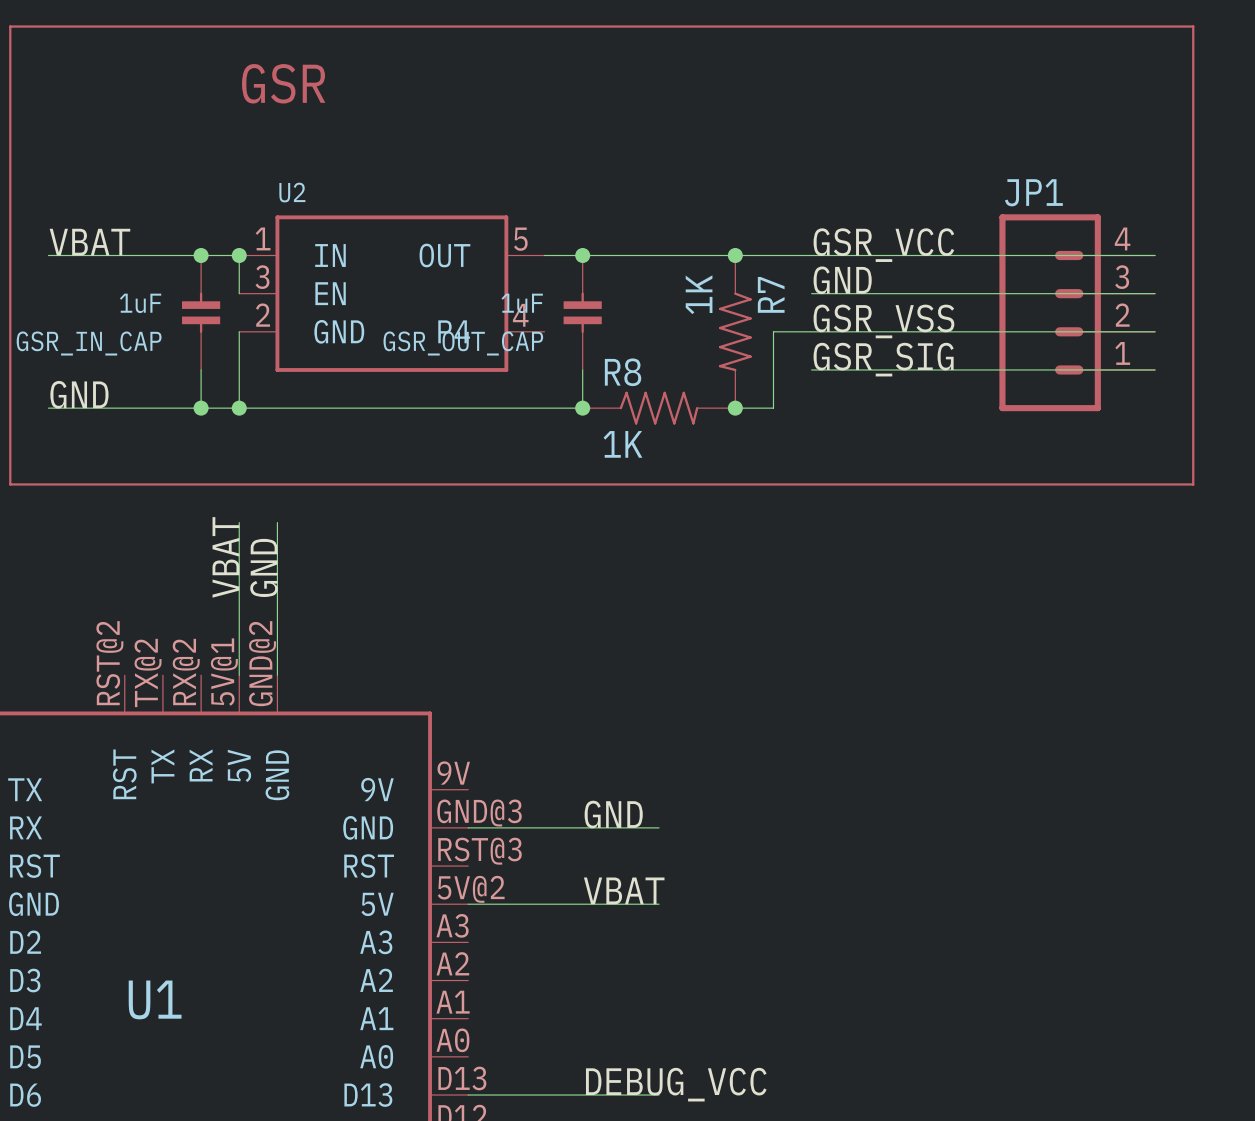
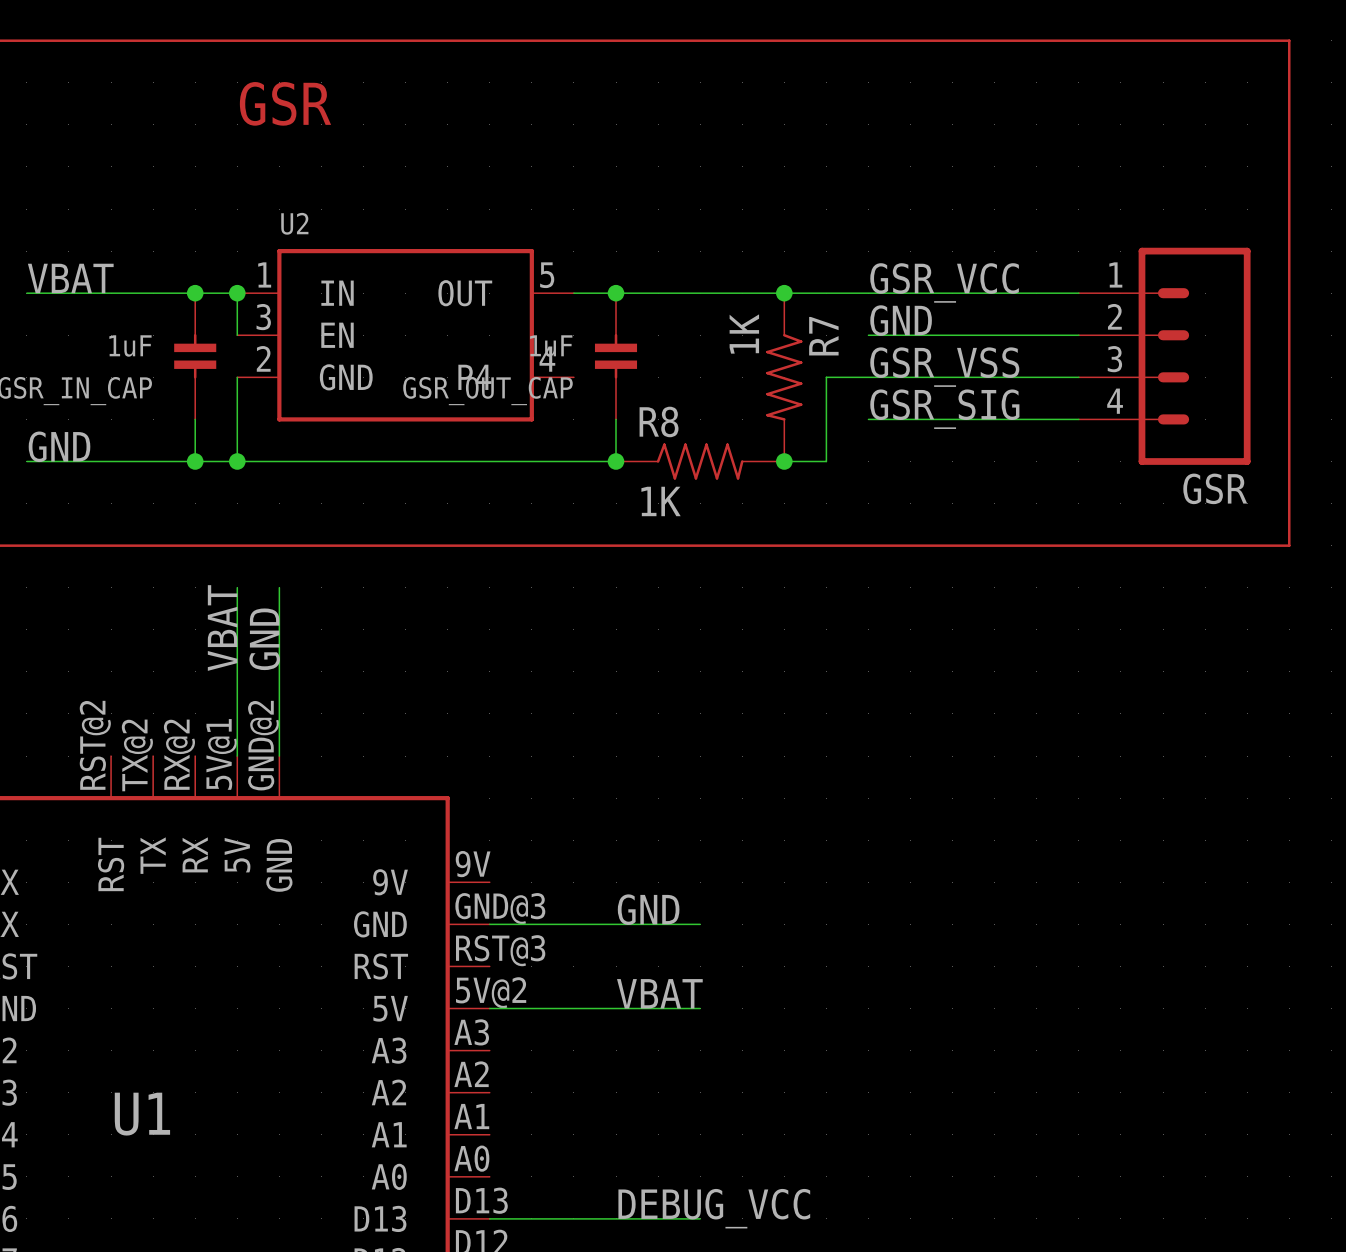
JP1: (1077, 312) -> none
GSR: none -> (1164, 356)

